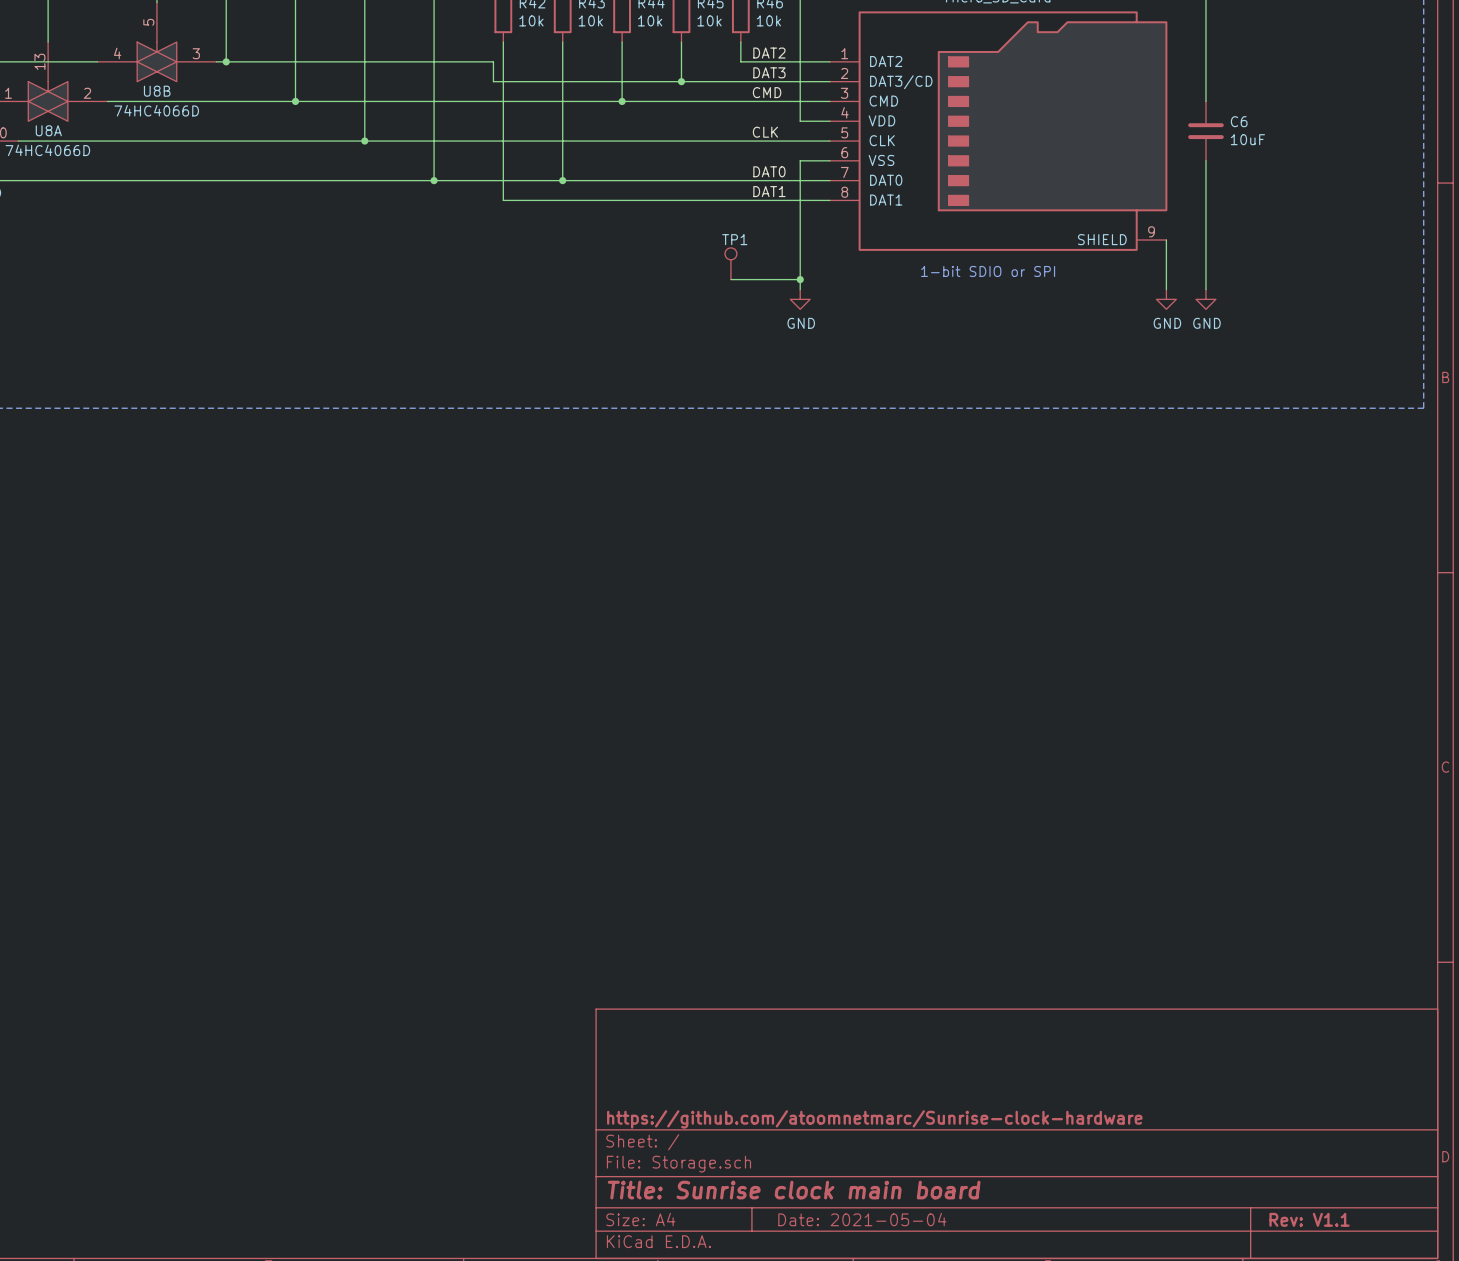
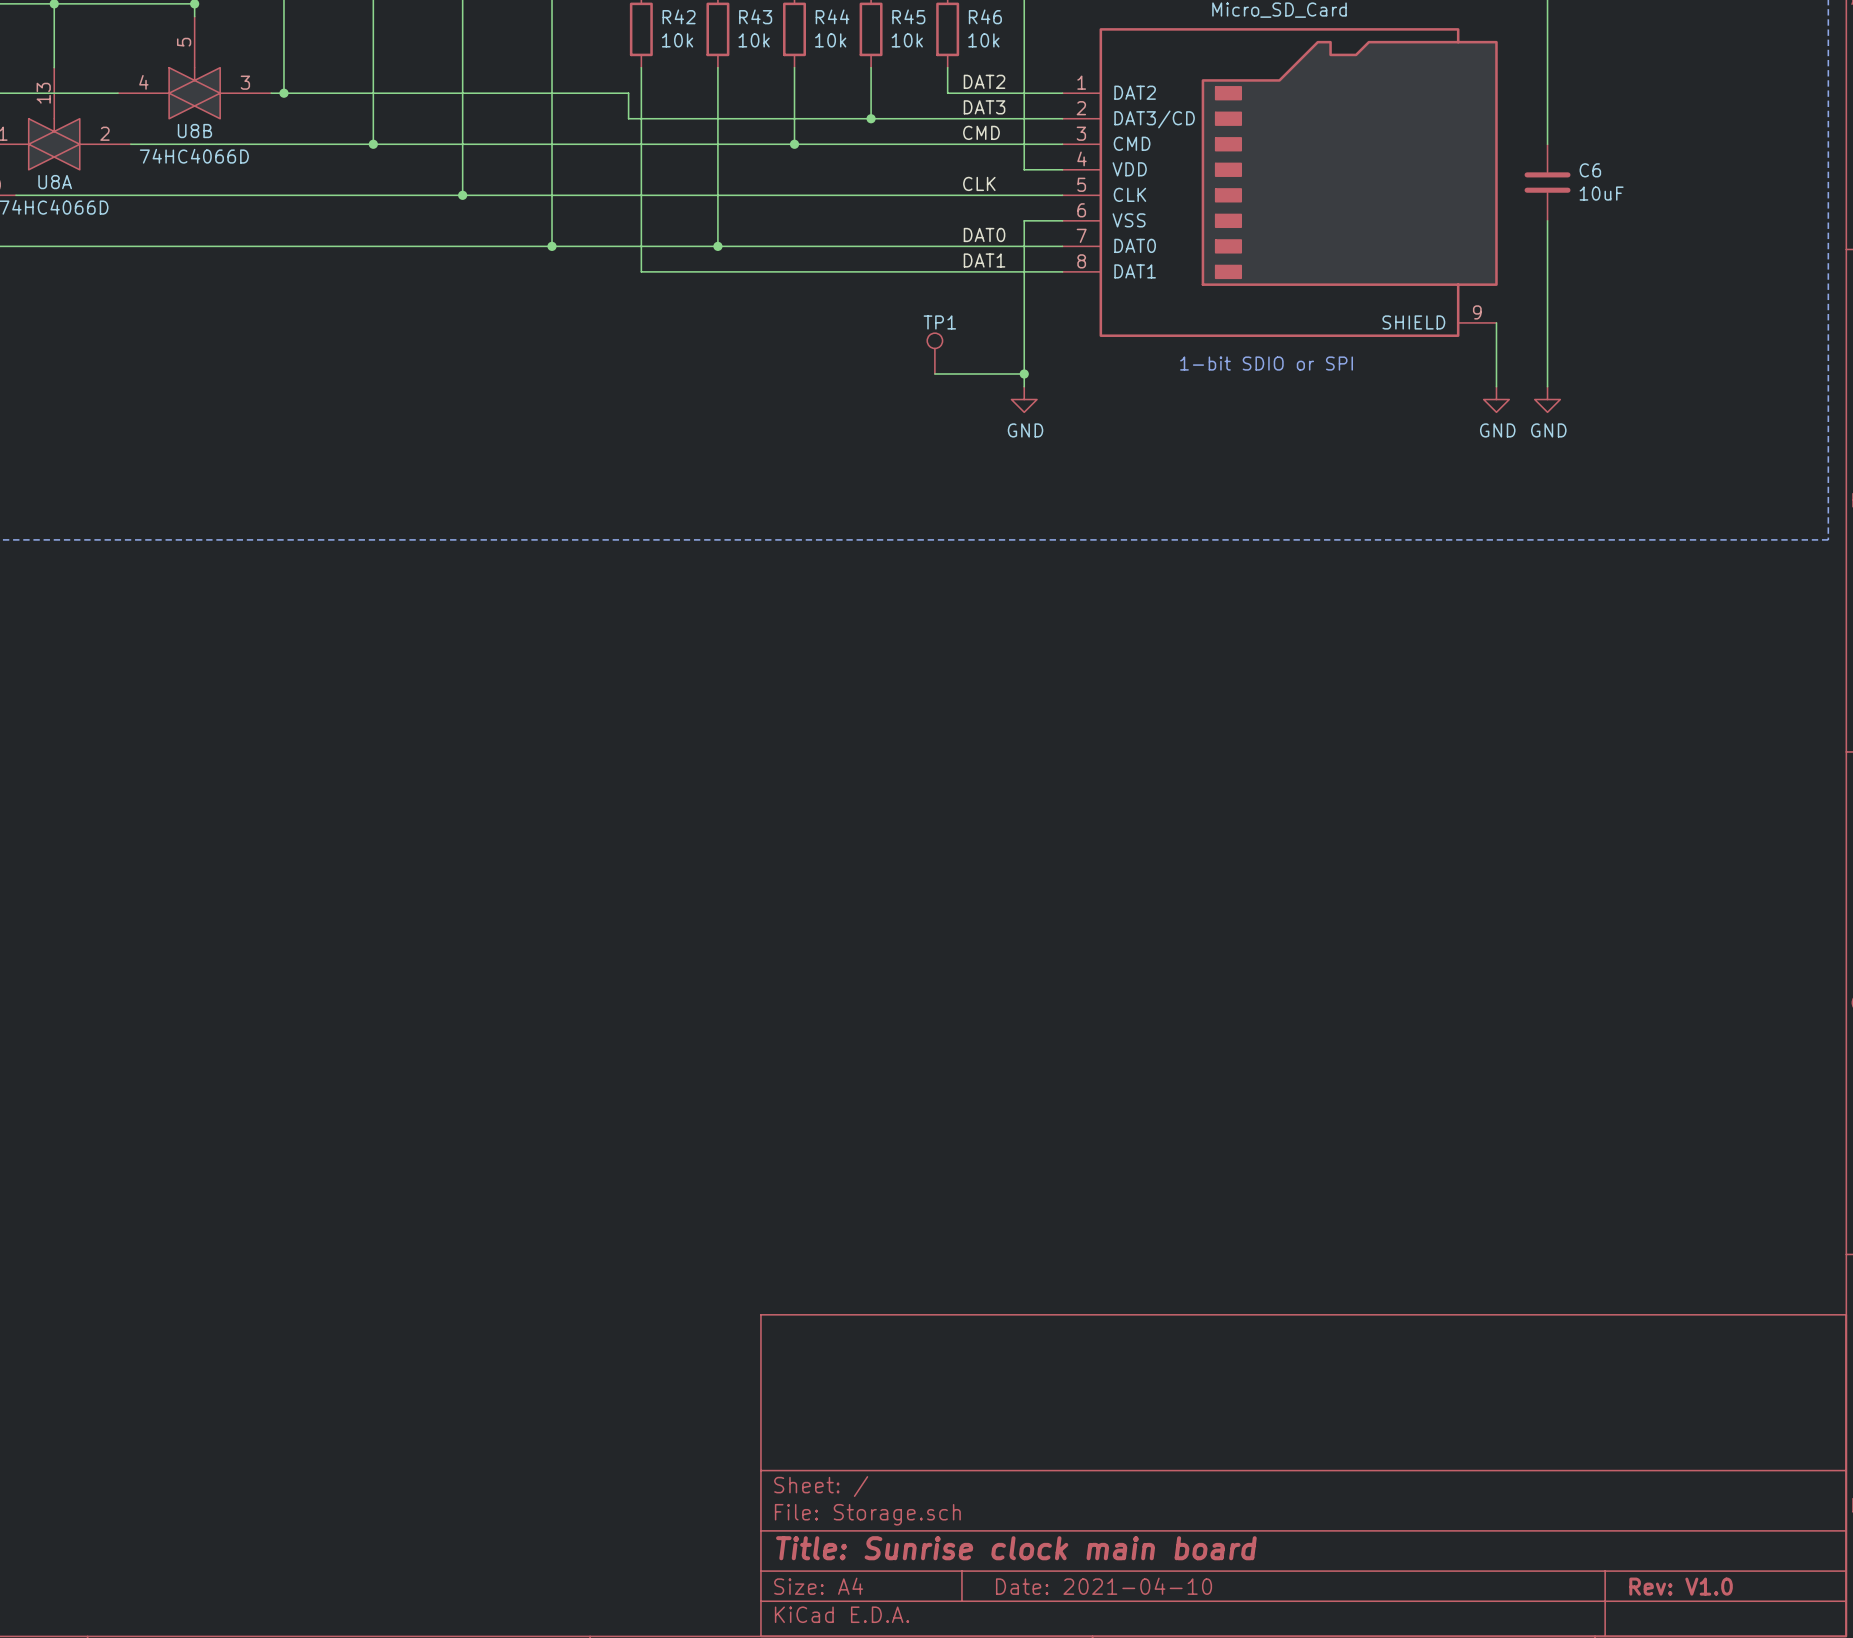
title block: https://github.com/atoomnetmarc/Sunrise-clock-hardware (874, 1119) -> none
title block: Date: 2021-05-04 (862, 1219) -> Date: 2021-04-10 (1104, 1586)
title block: Rev: V1.1 (1309, 1219) -> Rev: V1.0 (1681, 1586)

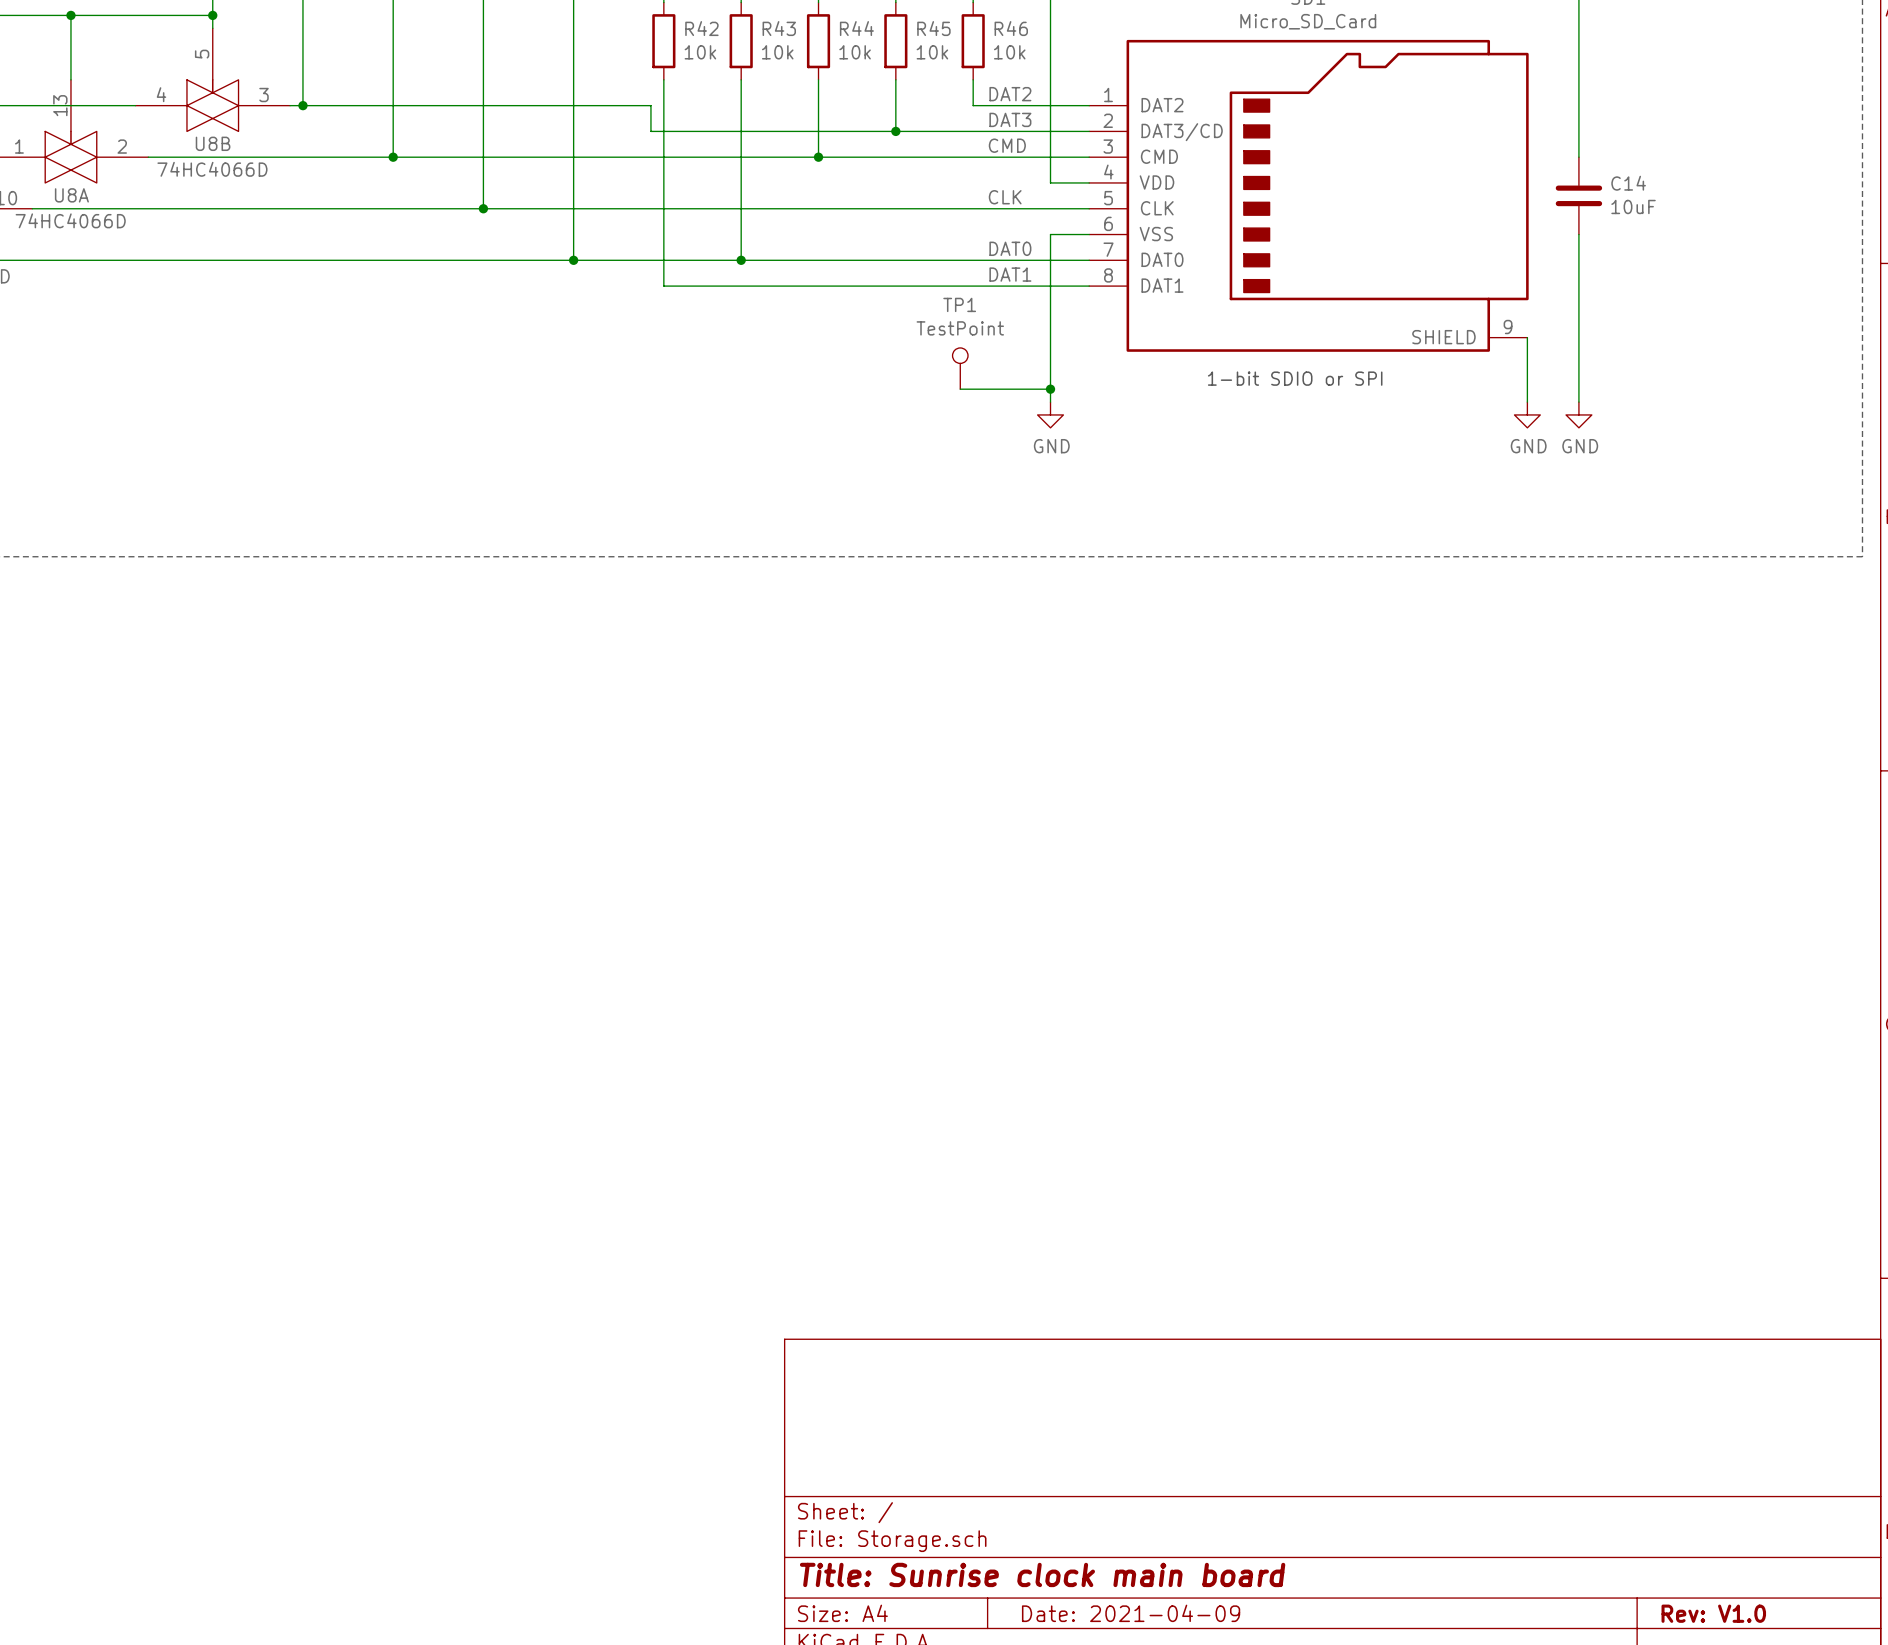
C6 name: C6 (1590, 170) -> C14 (1628, 183)
TP1 value: none -> TestPoint (960, 328)
TP1 name position: TP1 (939, 322) -> TP1 (959, 304)
title block: Date: 2021-04-10 (1104, 1586) -> Date: 2021-04-09 (1131, 1613)

